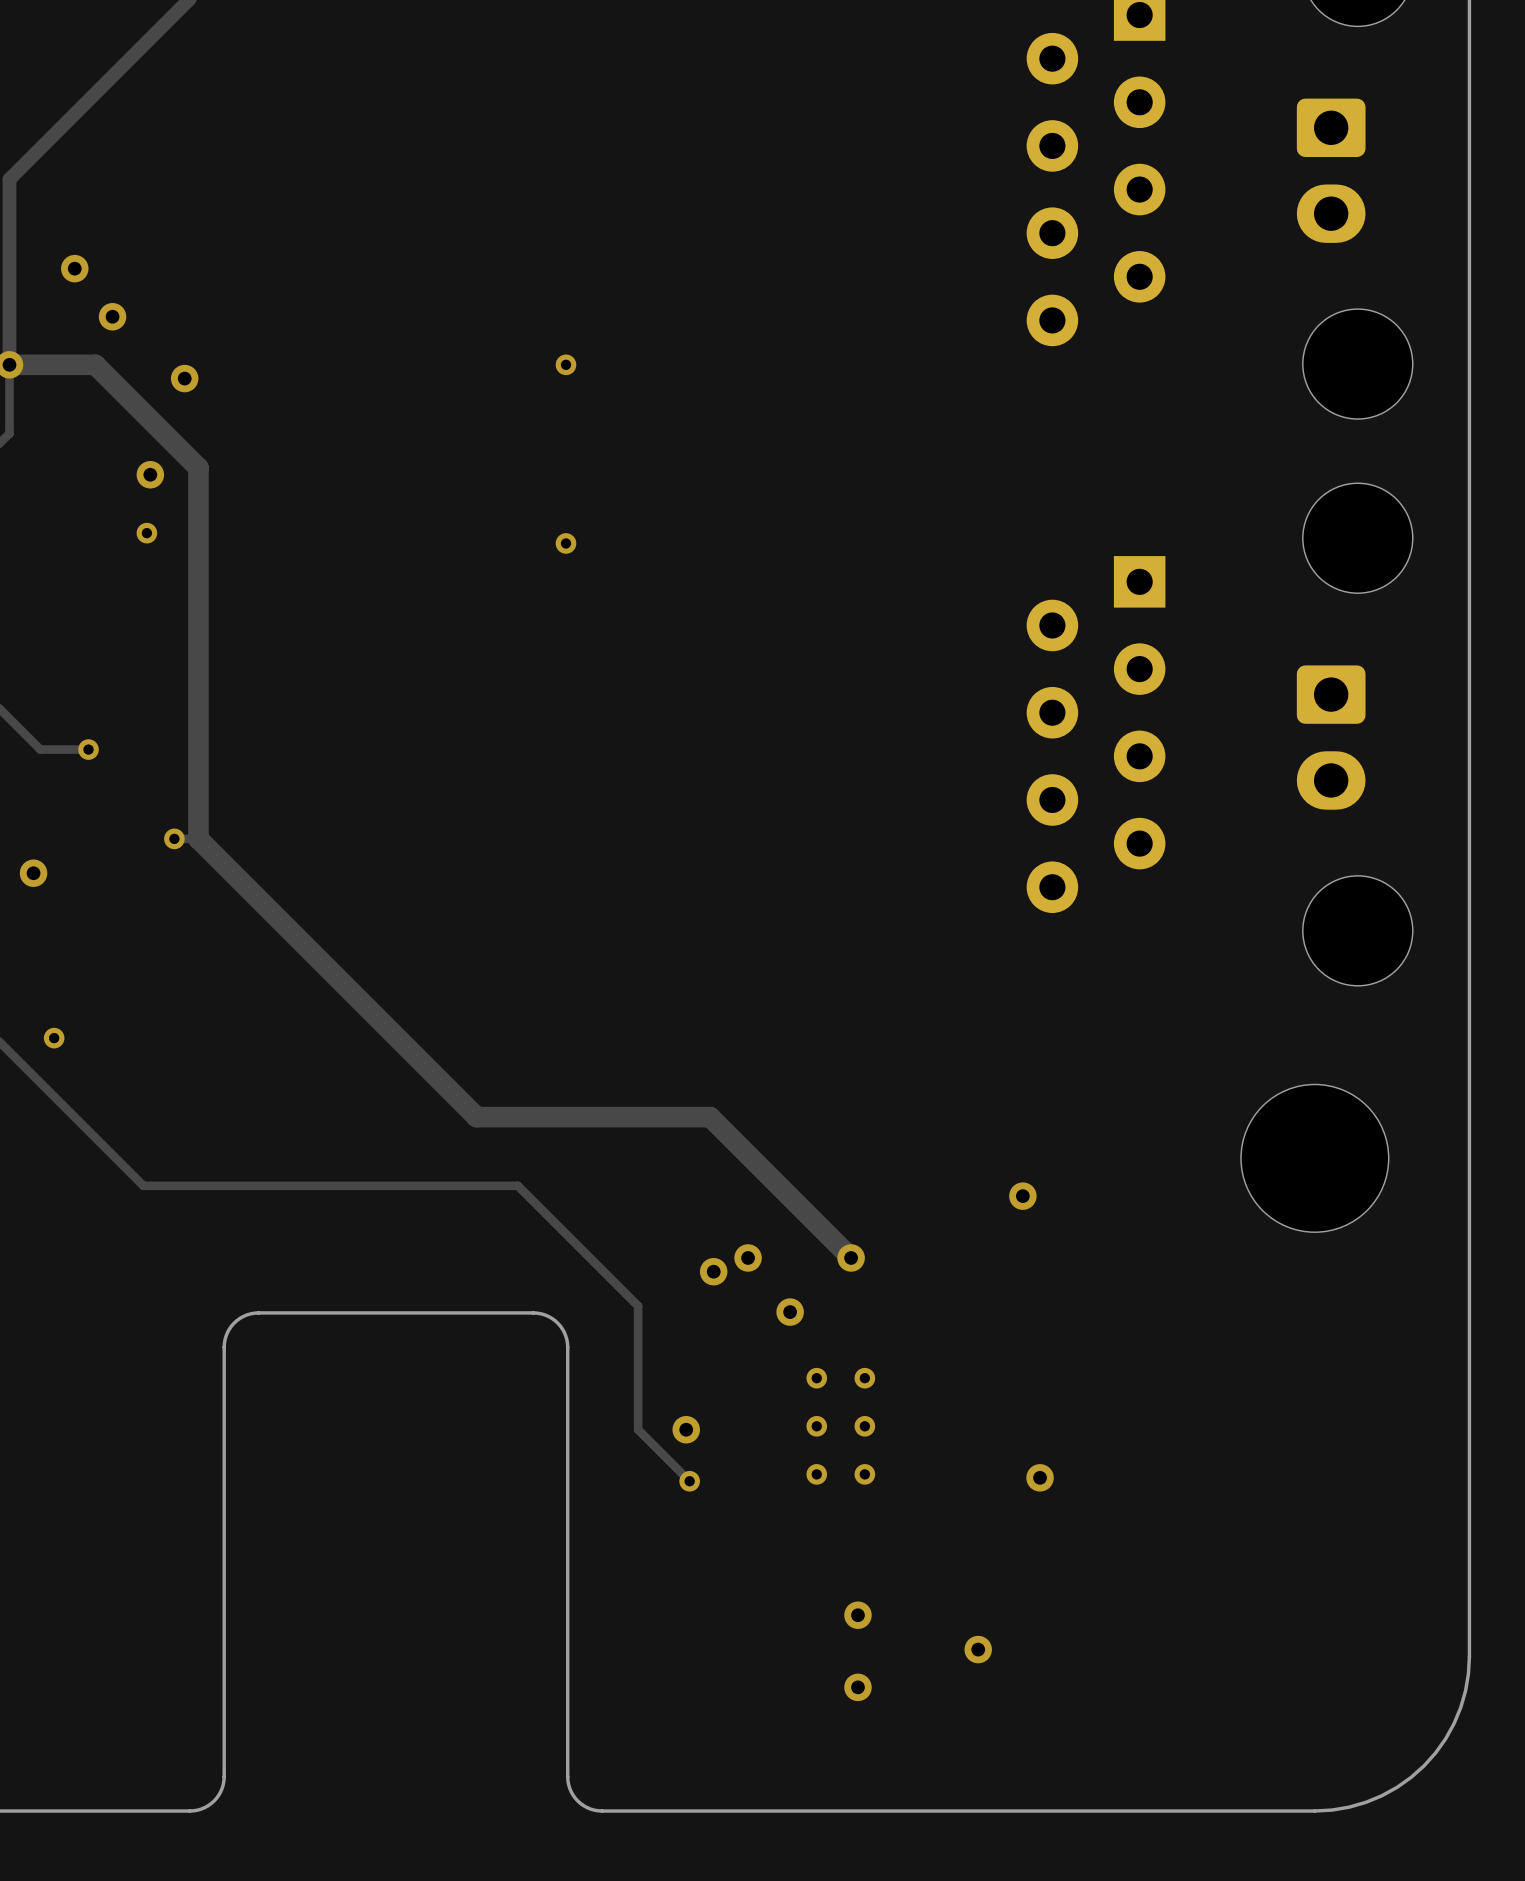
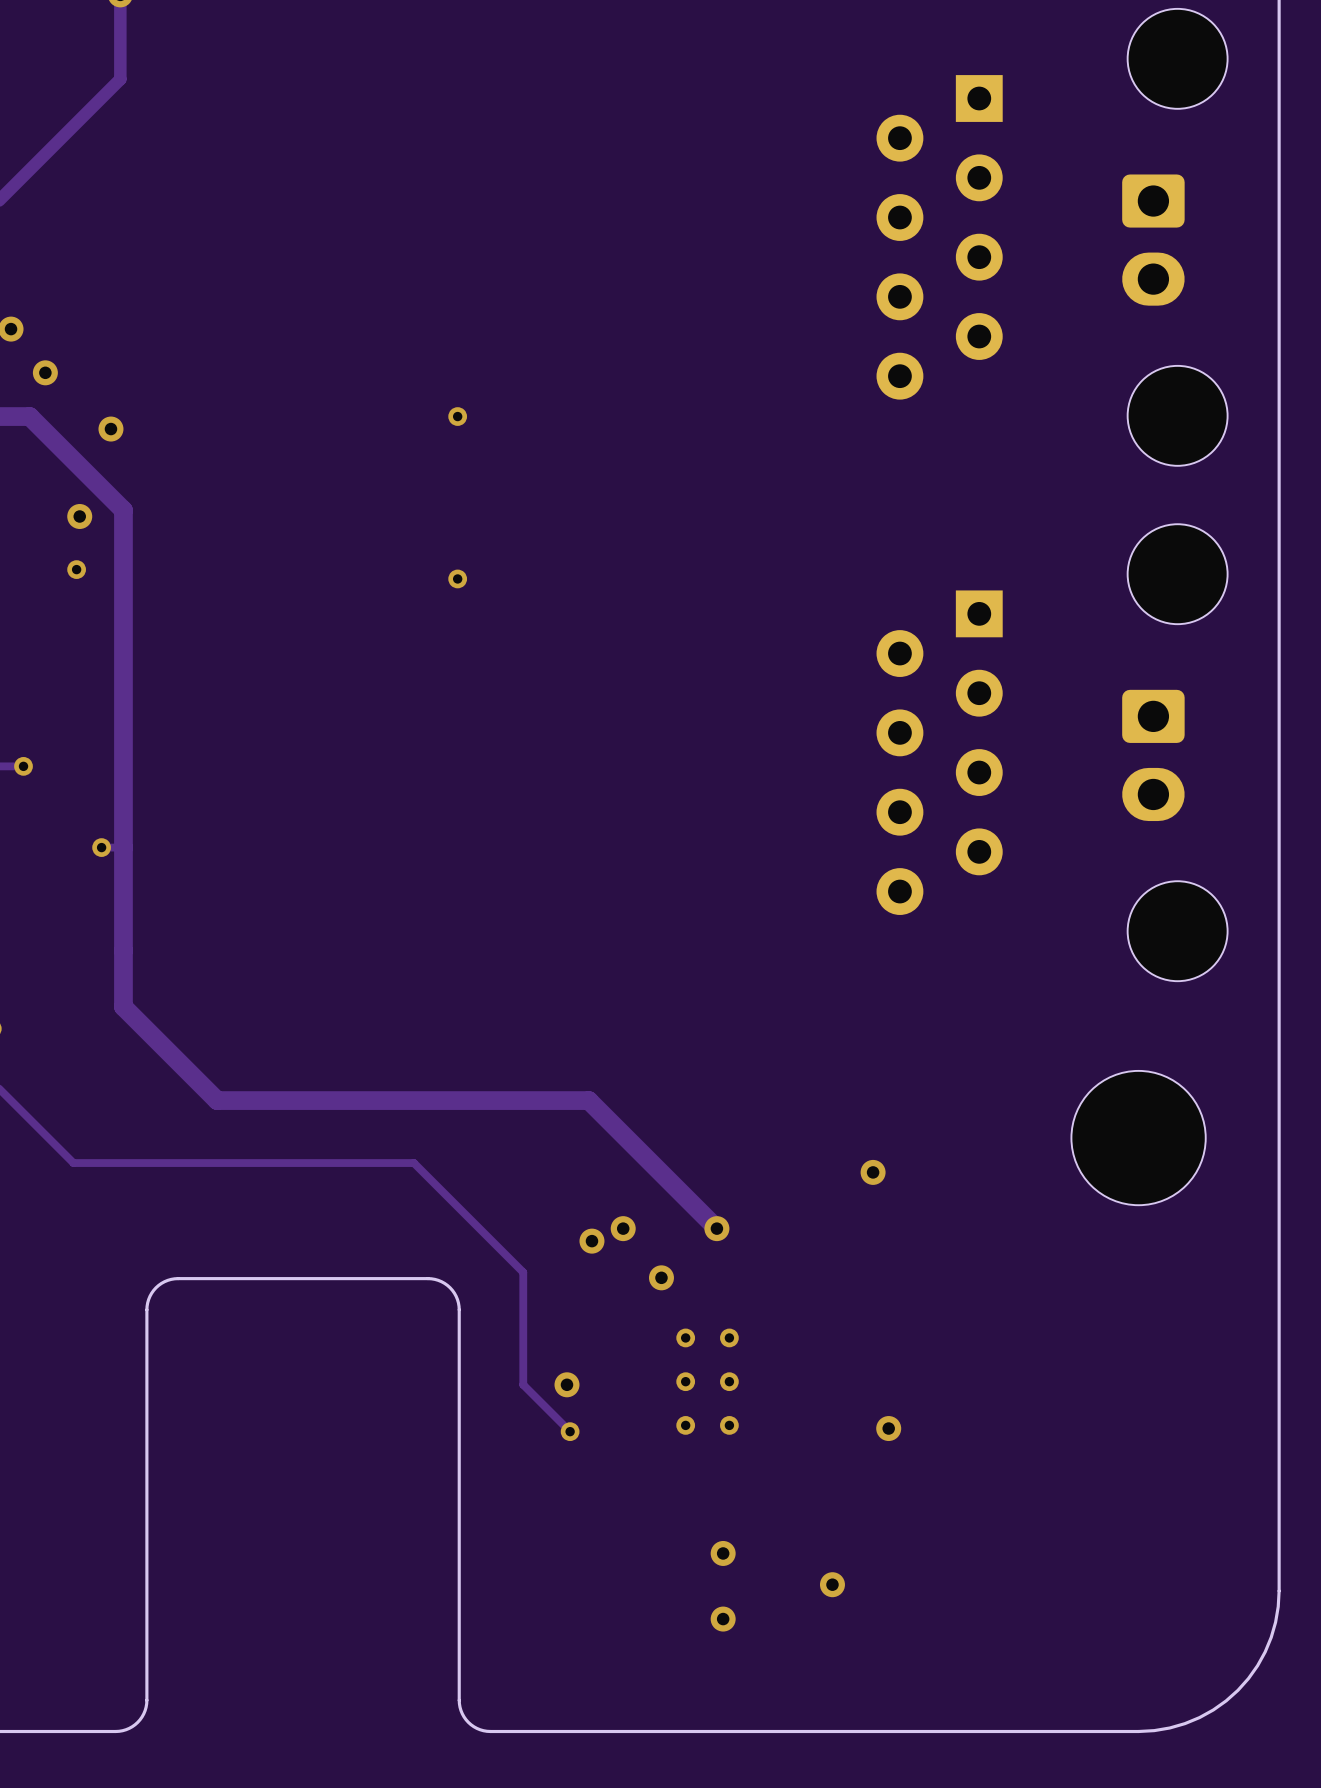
track: (198, 838) (476, 1117) -> (123, 847) (123, 1006) (217, 1100) (376, 1100)

